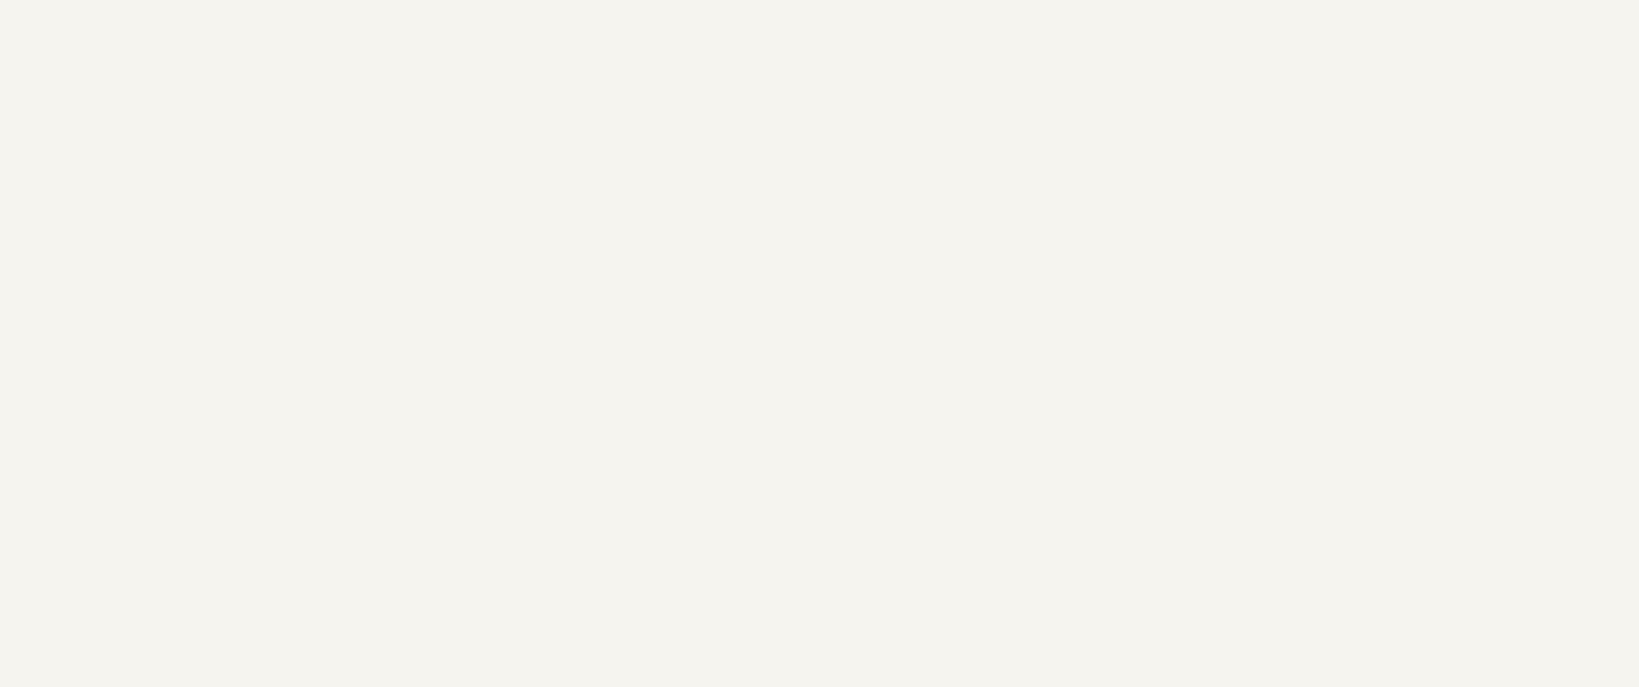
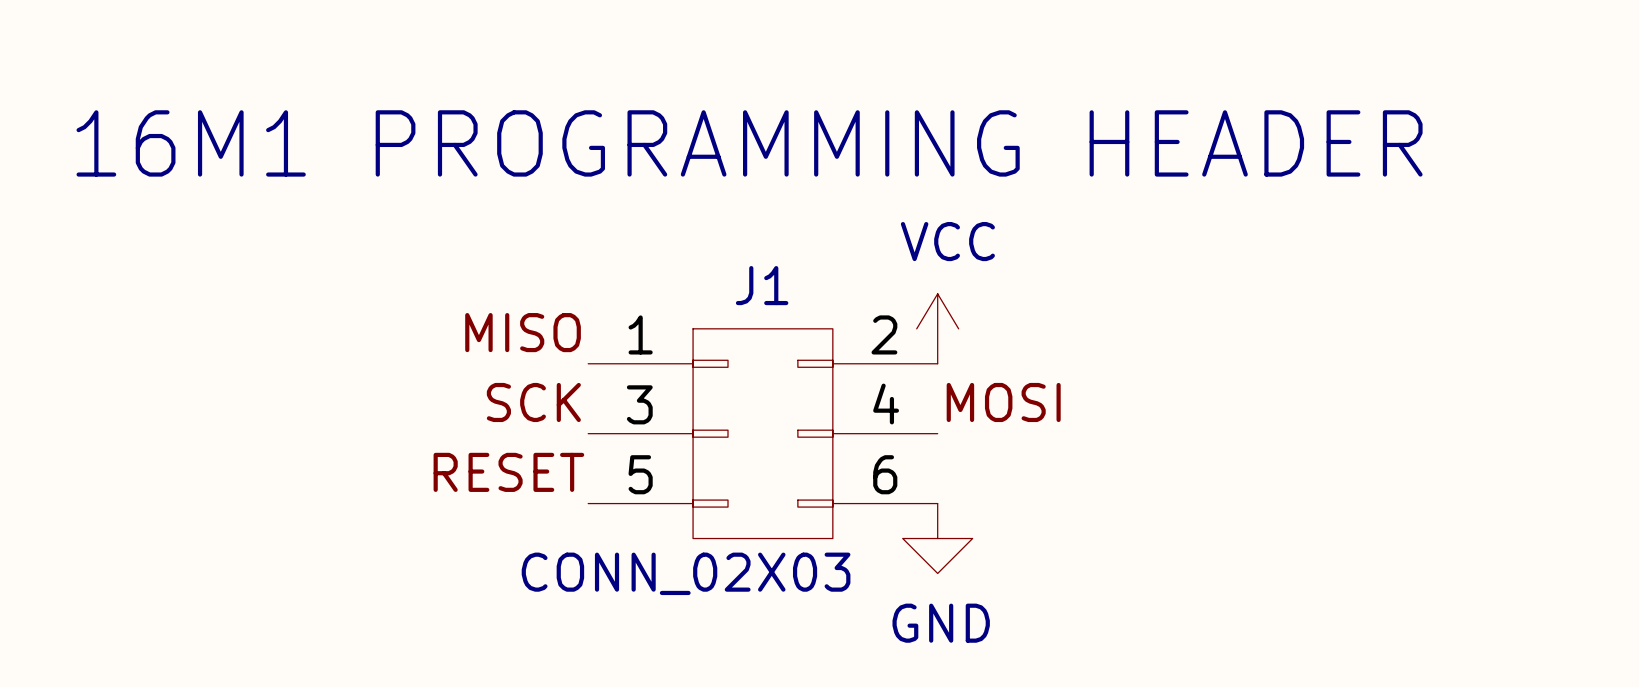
text: none -> 16M1 PROGRAMMING HEADER (749, 143)
power symbol: none -> VCC (937, 328)
label: none -> MISO (523, 332)
label: none -> SCK (533, 402)
label: none -> MOSI (1003, 402)
J1: none -> CONN_02X03 (762, 433)
label: none -> RESET (508, 472)
power symbol: none -> GND (937, 538)

